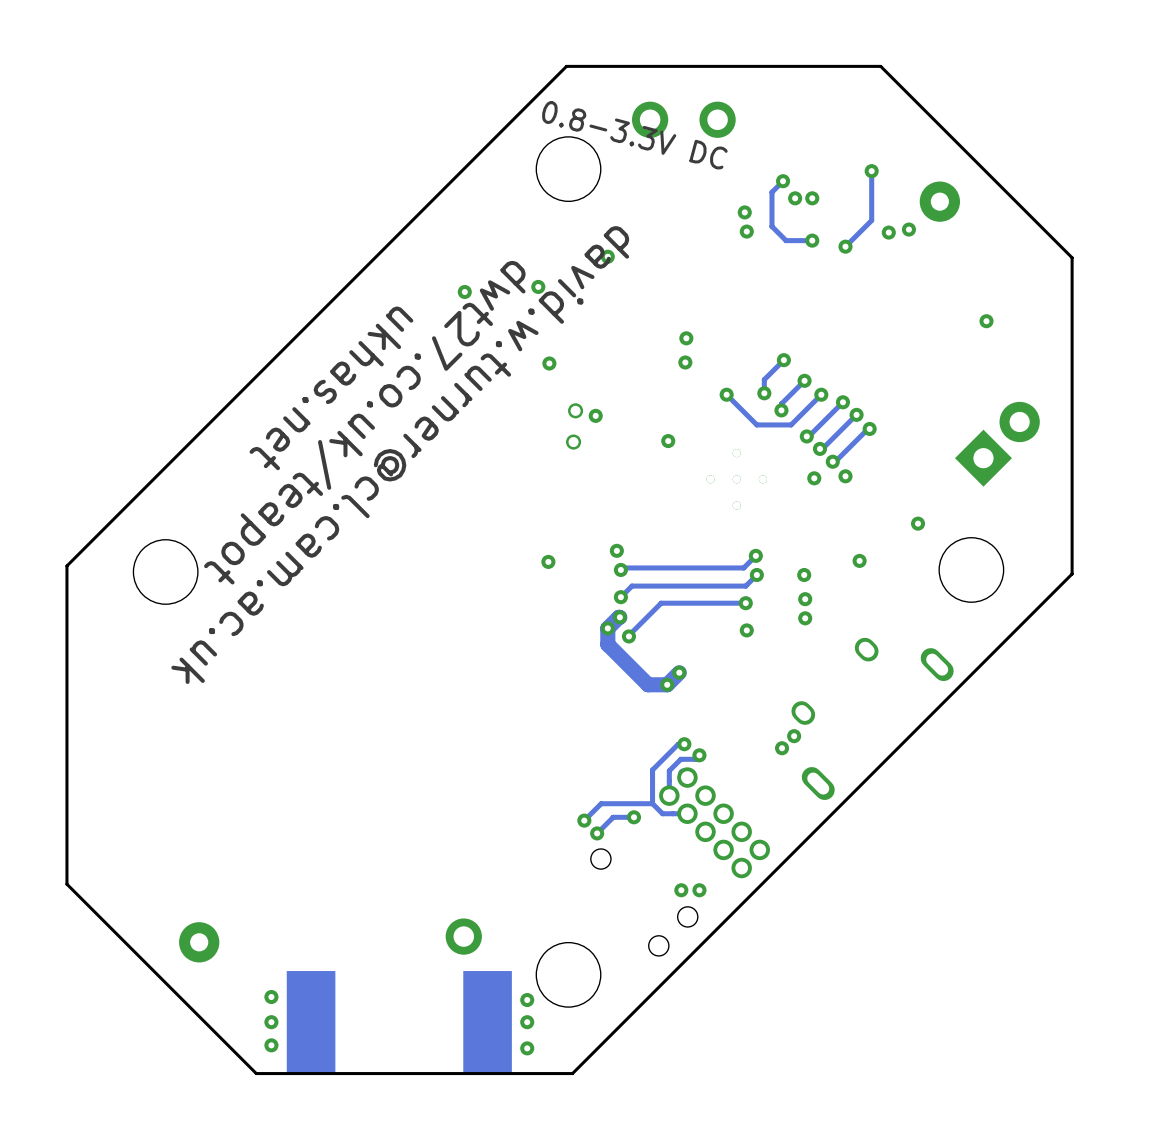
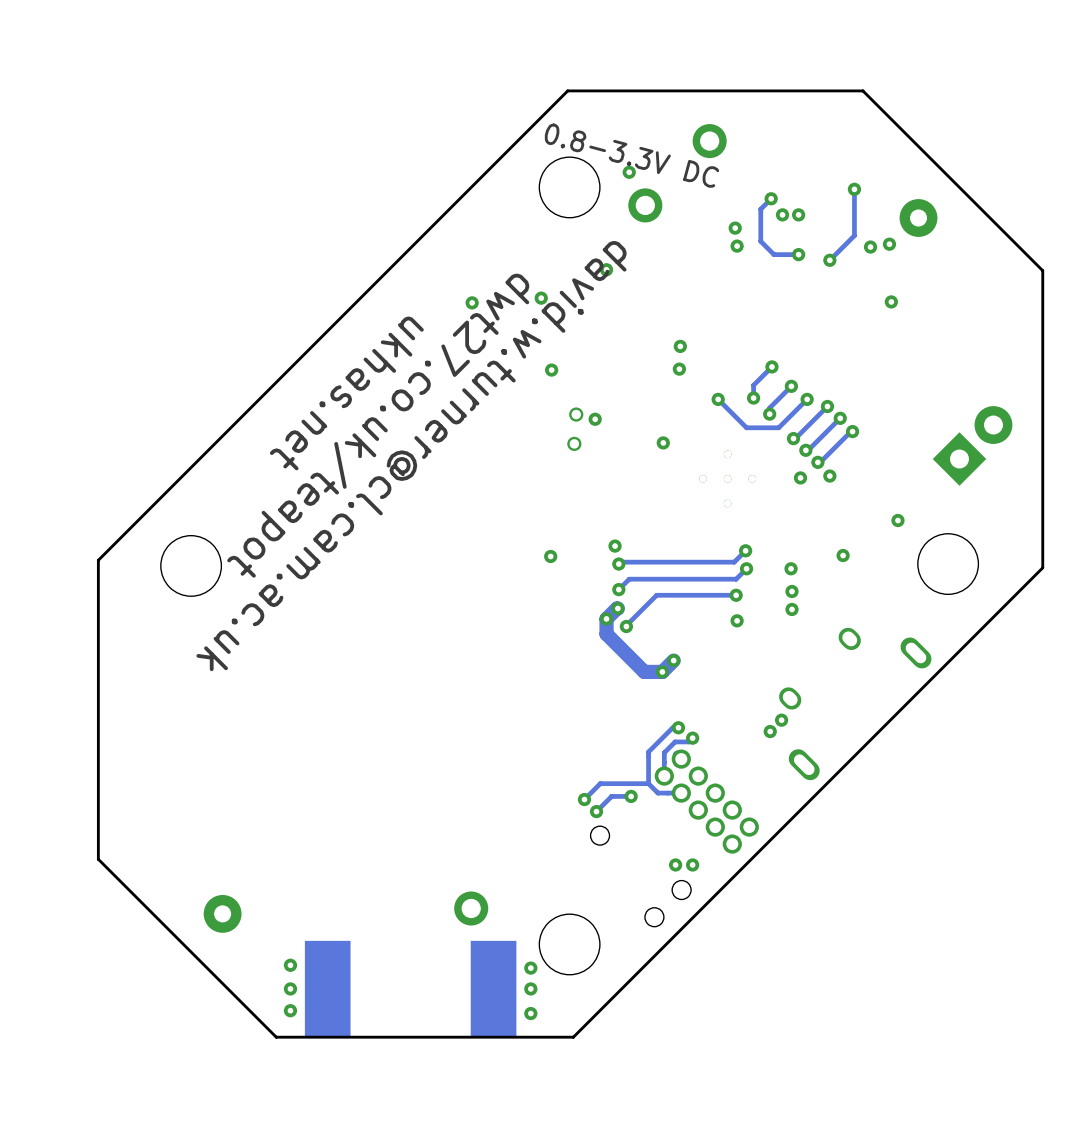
part position: (650, 119) -> (645, 205)
via: none -> (629, 172)
via position: (986, 321) -> (891, 301)

